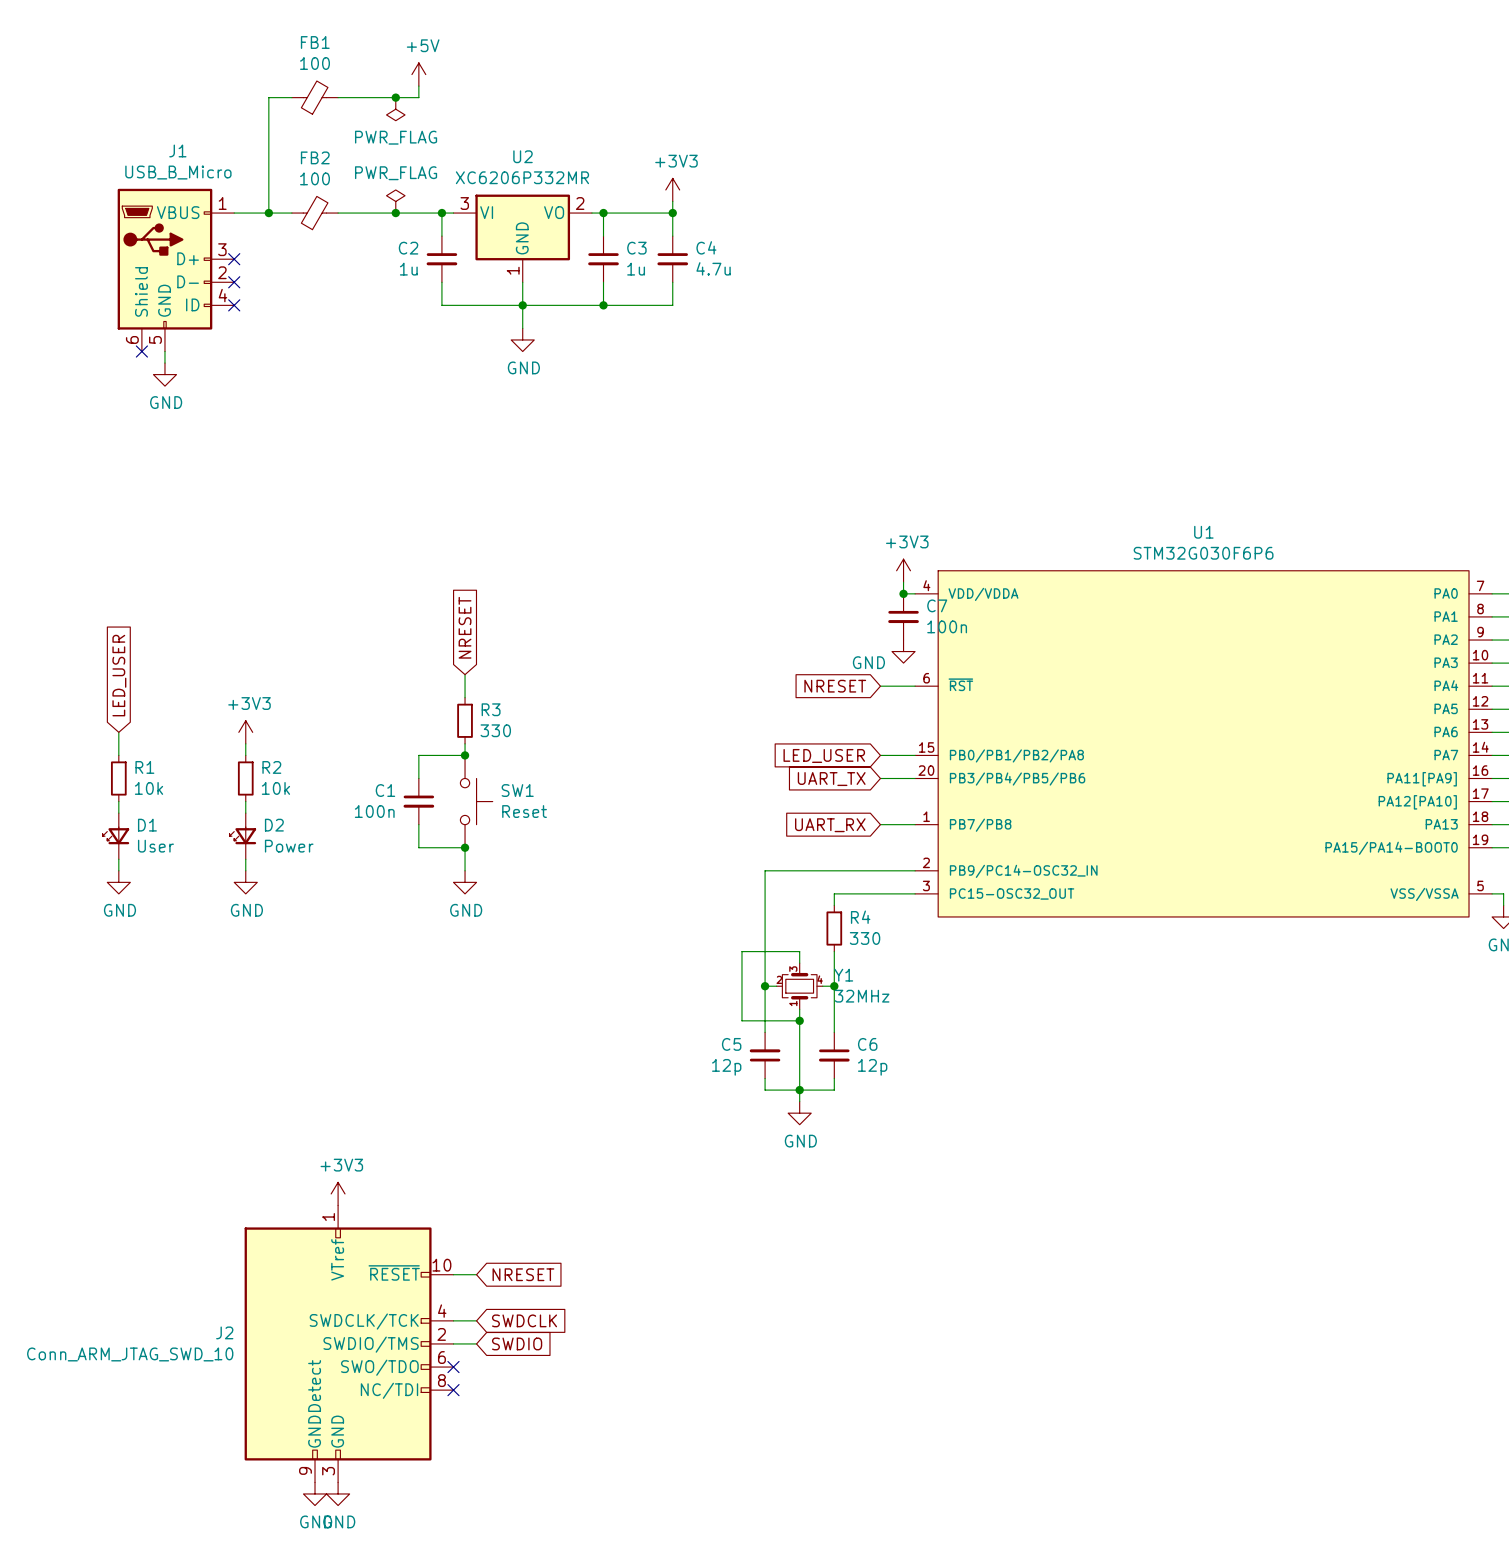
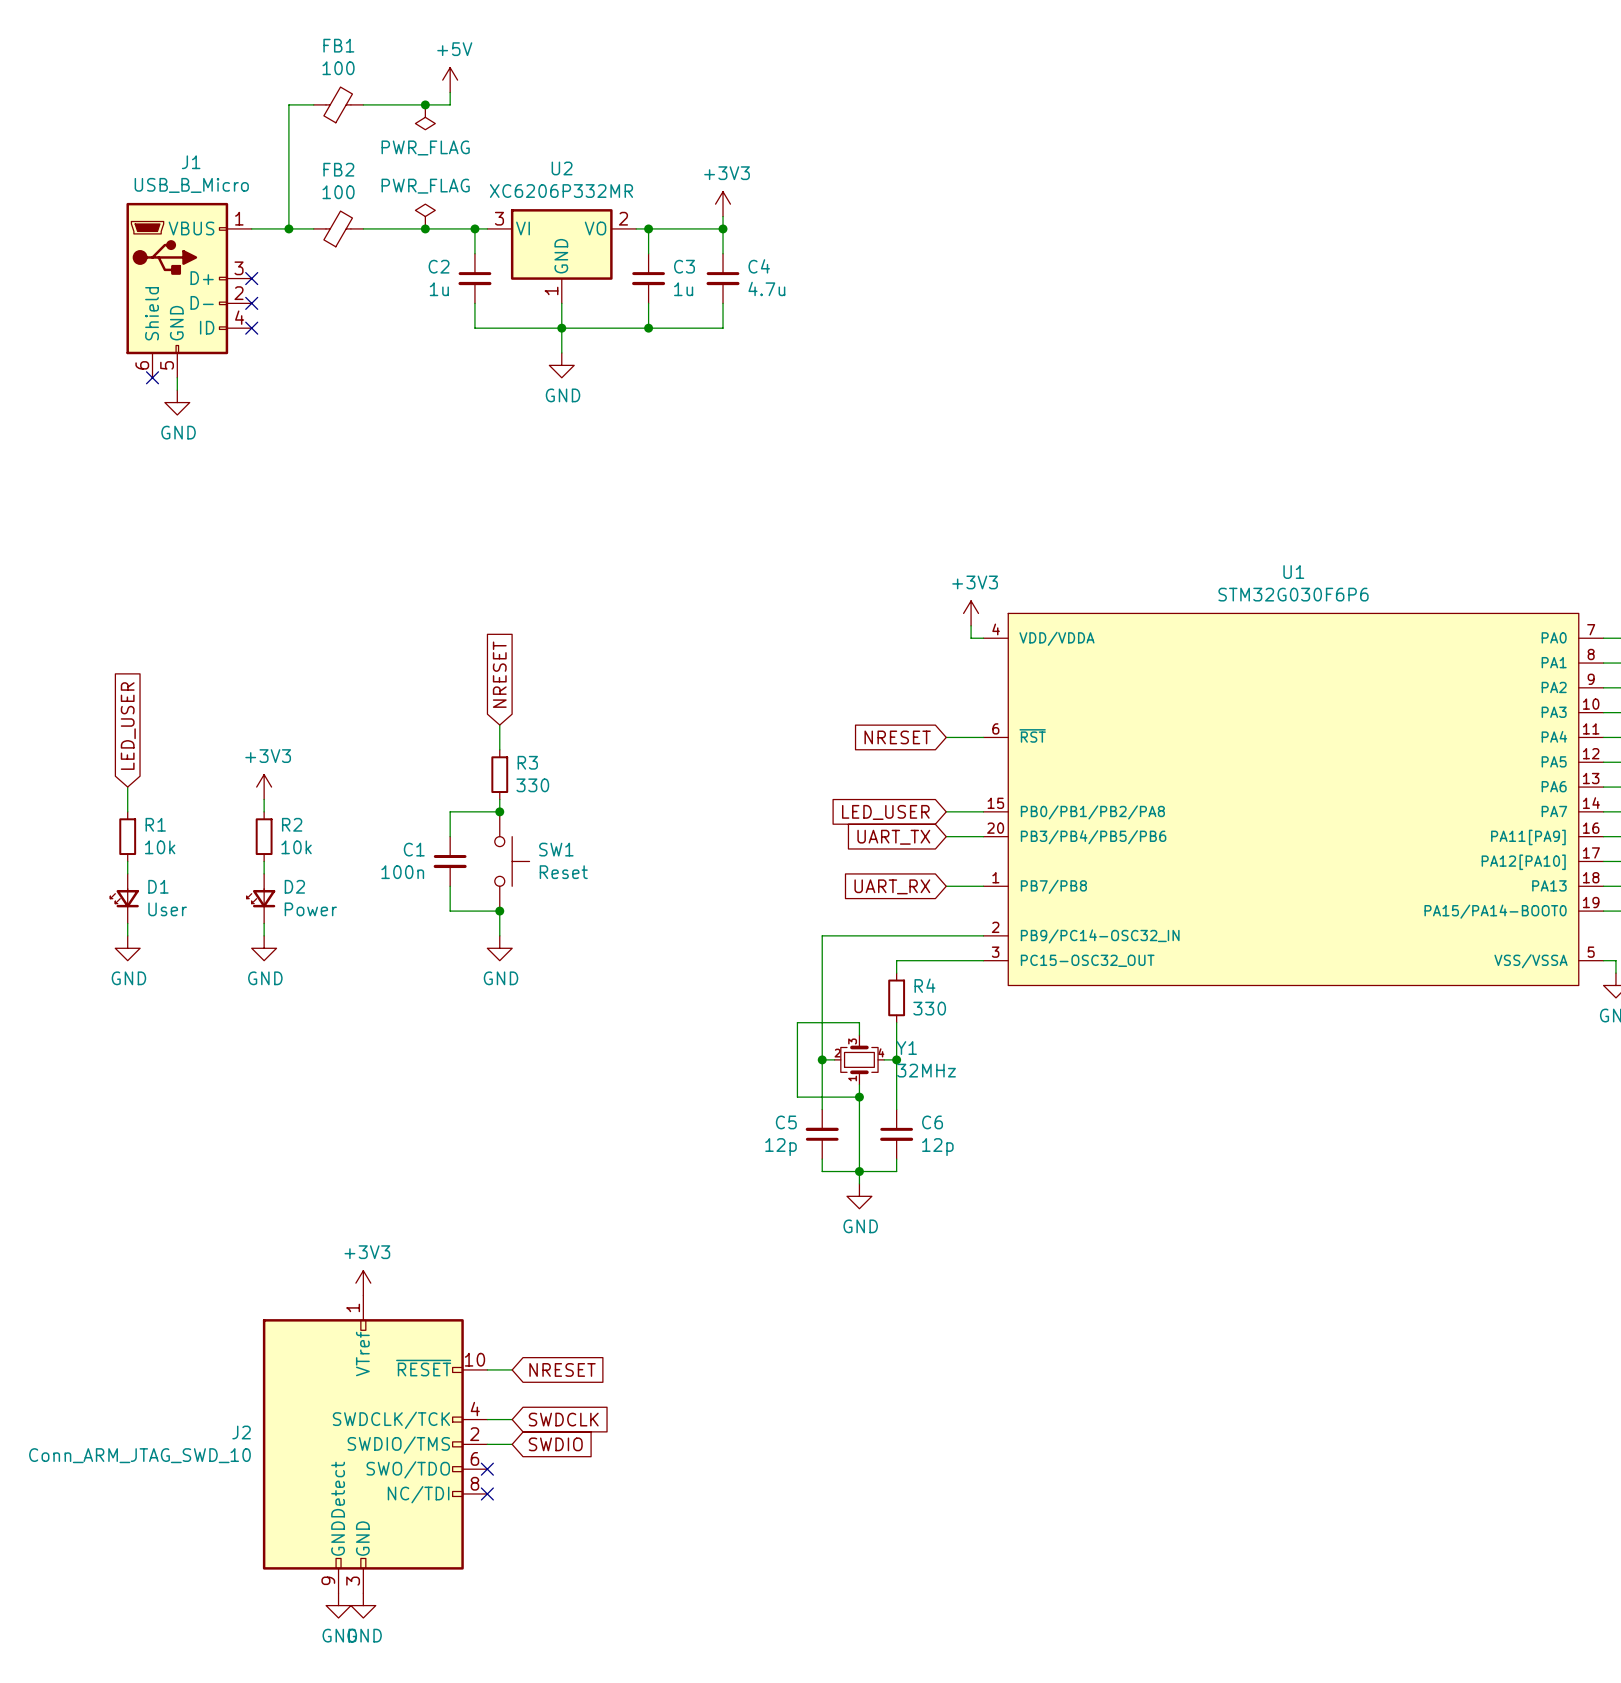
junction: (903, 593) -> none
C7: 100n (903, 616) -> none
power symbol: GND (903, 651) -> none

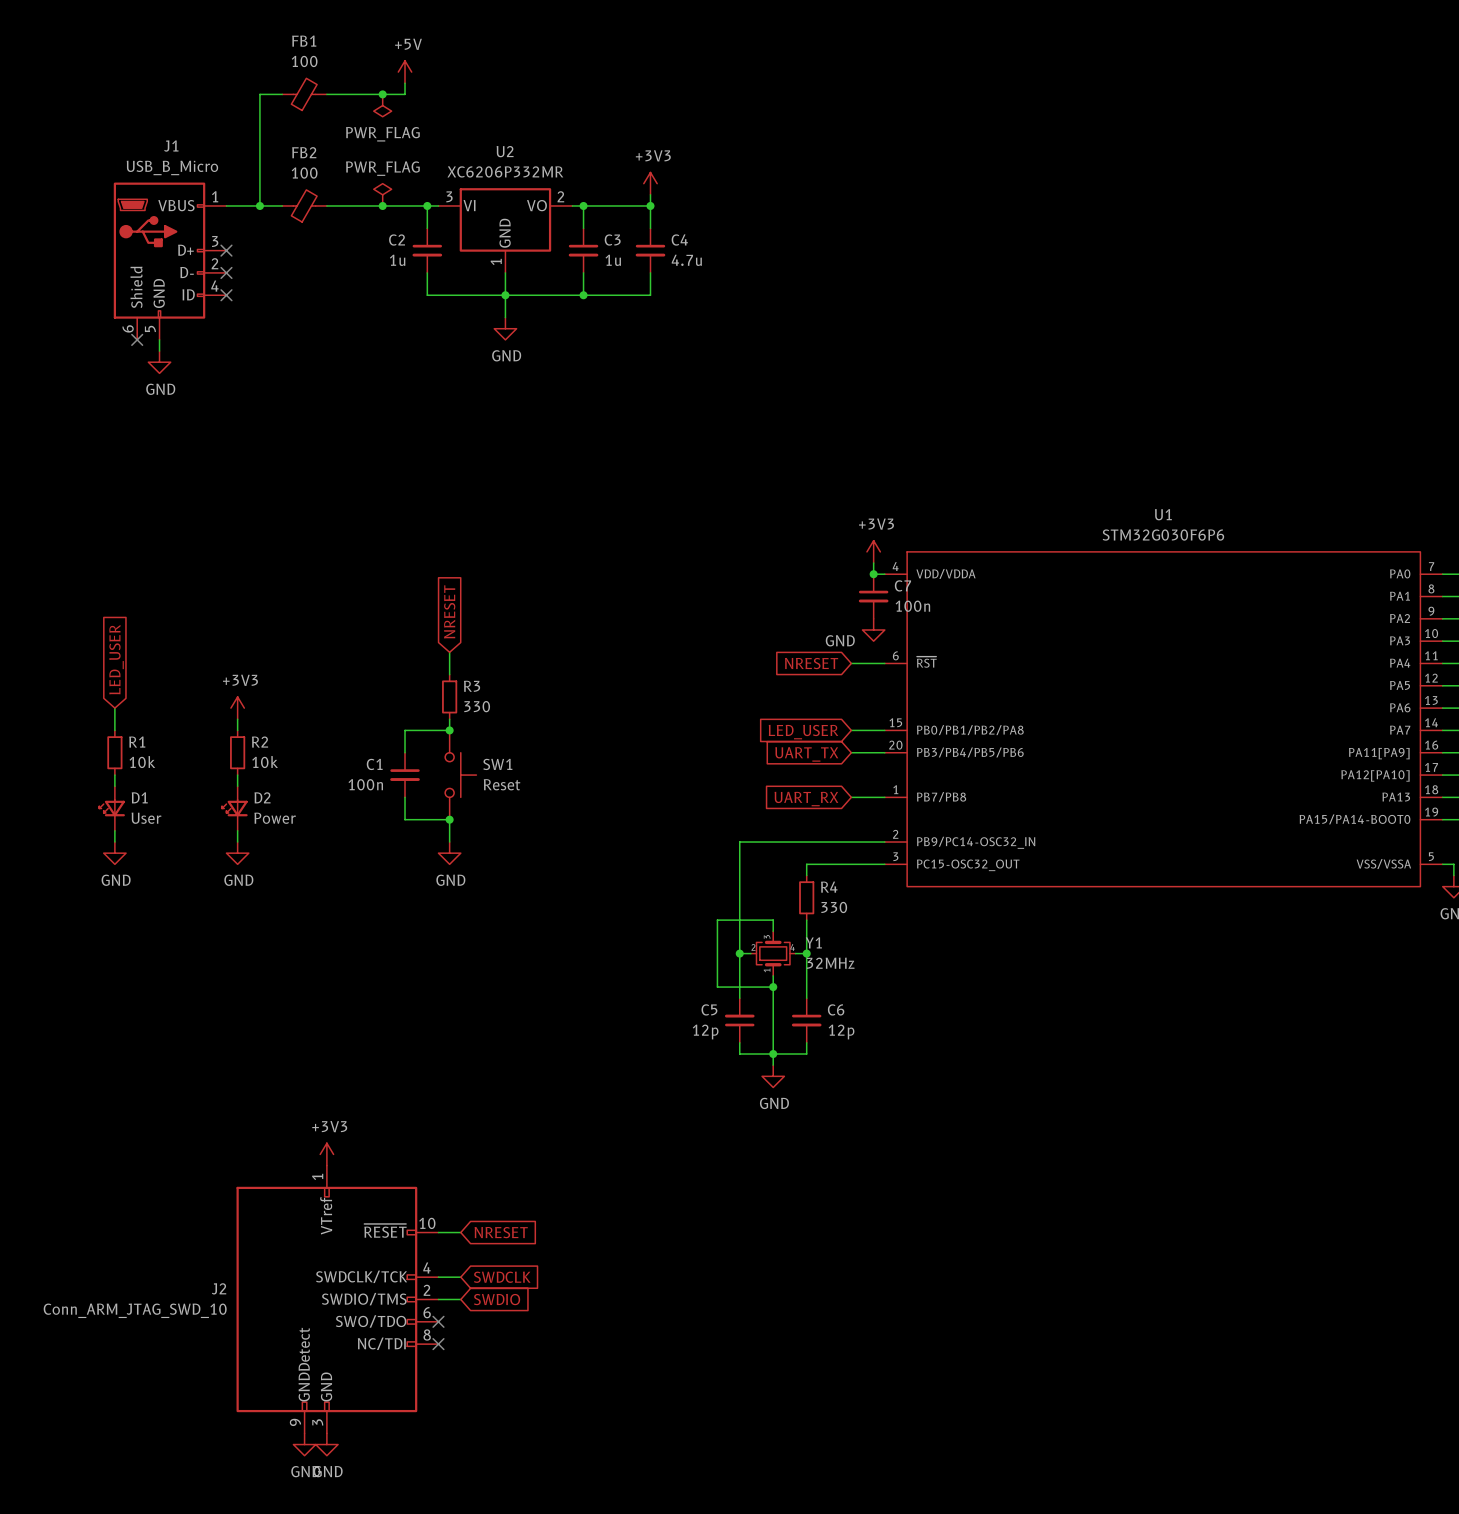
junction: none -> (873, 574)
C7: none -> 100n (873, 596)
power symbol: none -> GND (873, 630)

